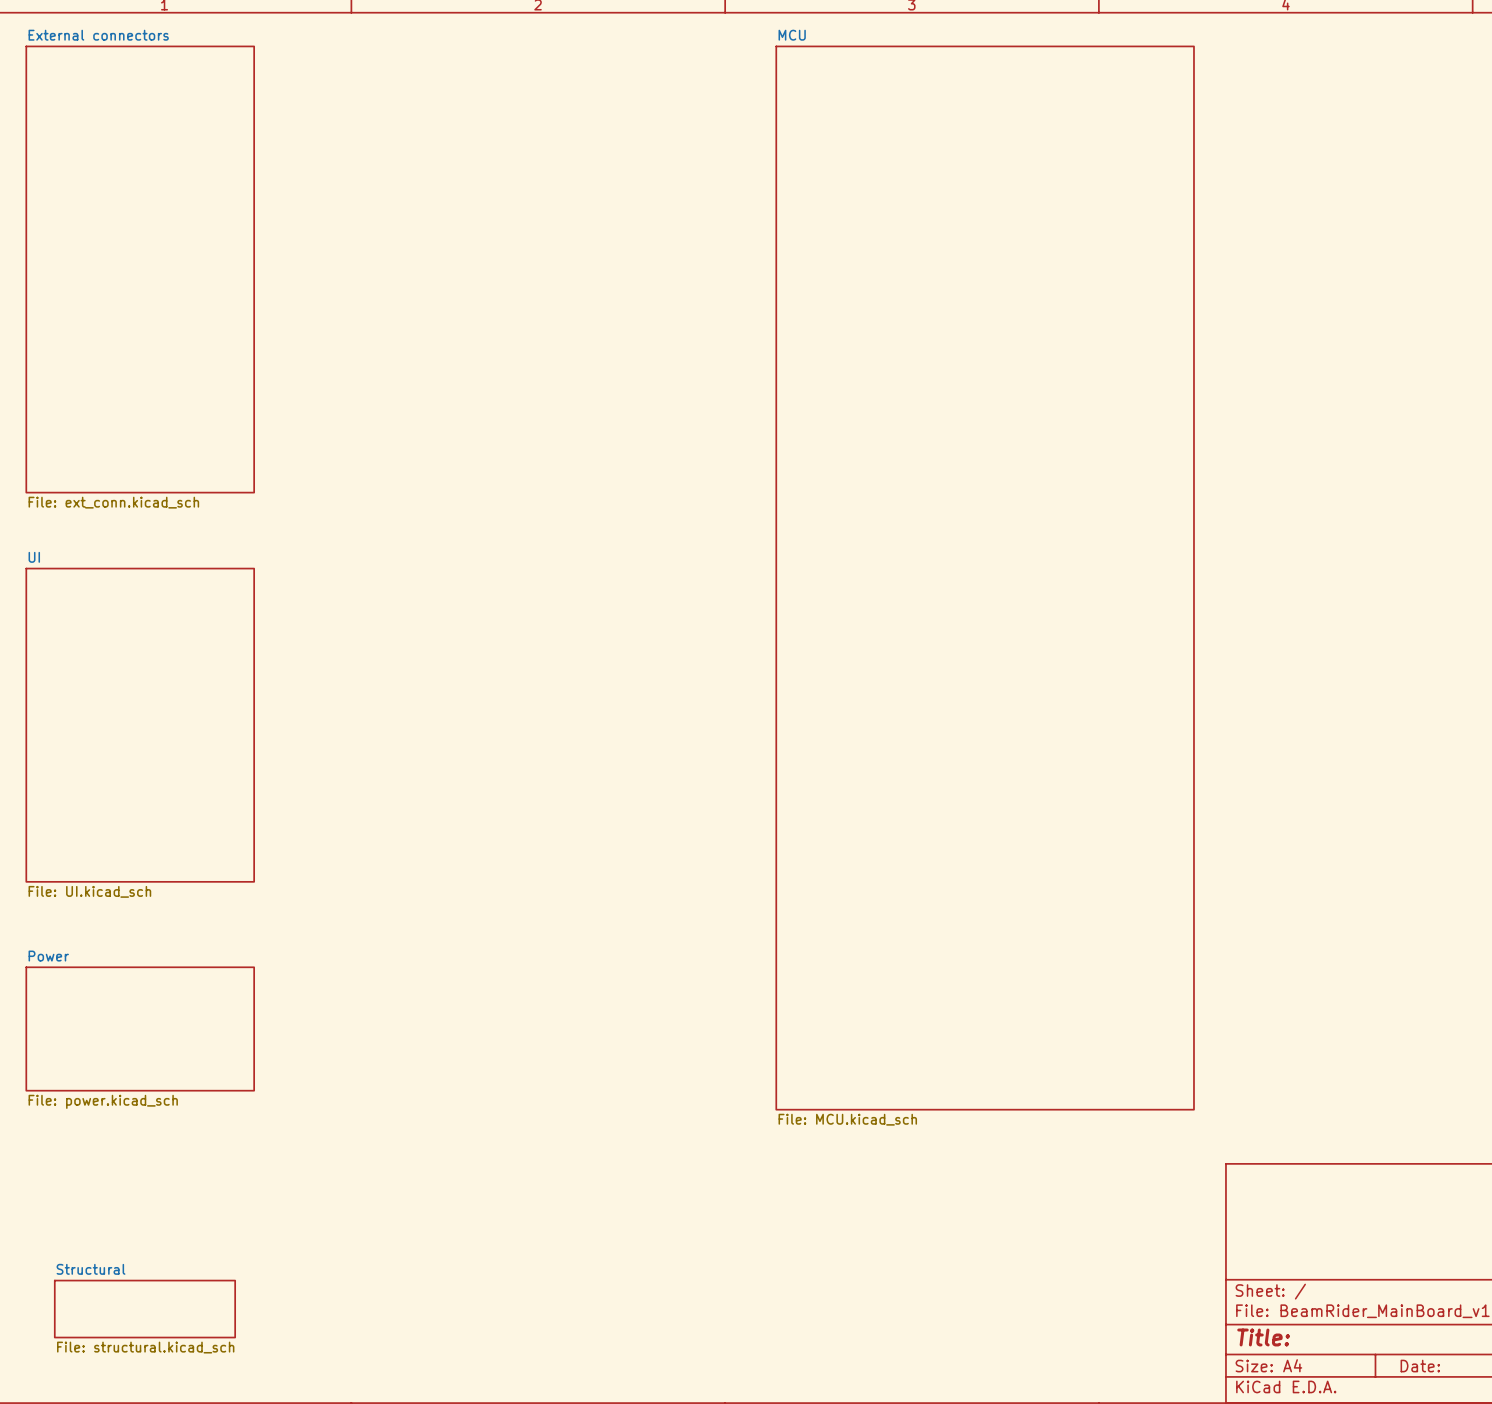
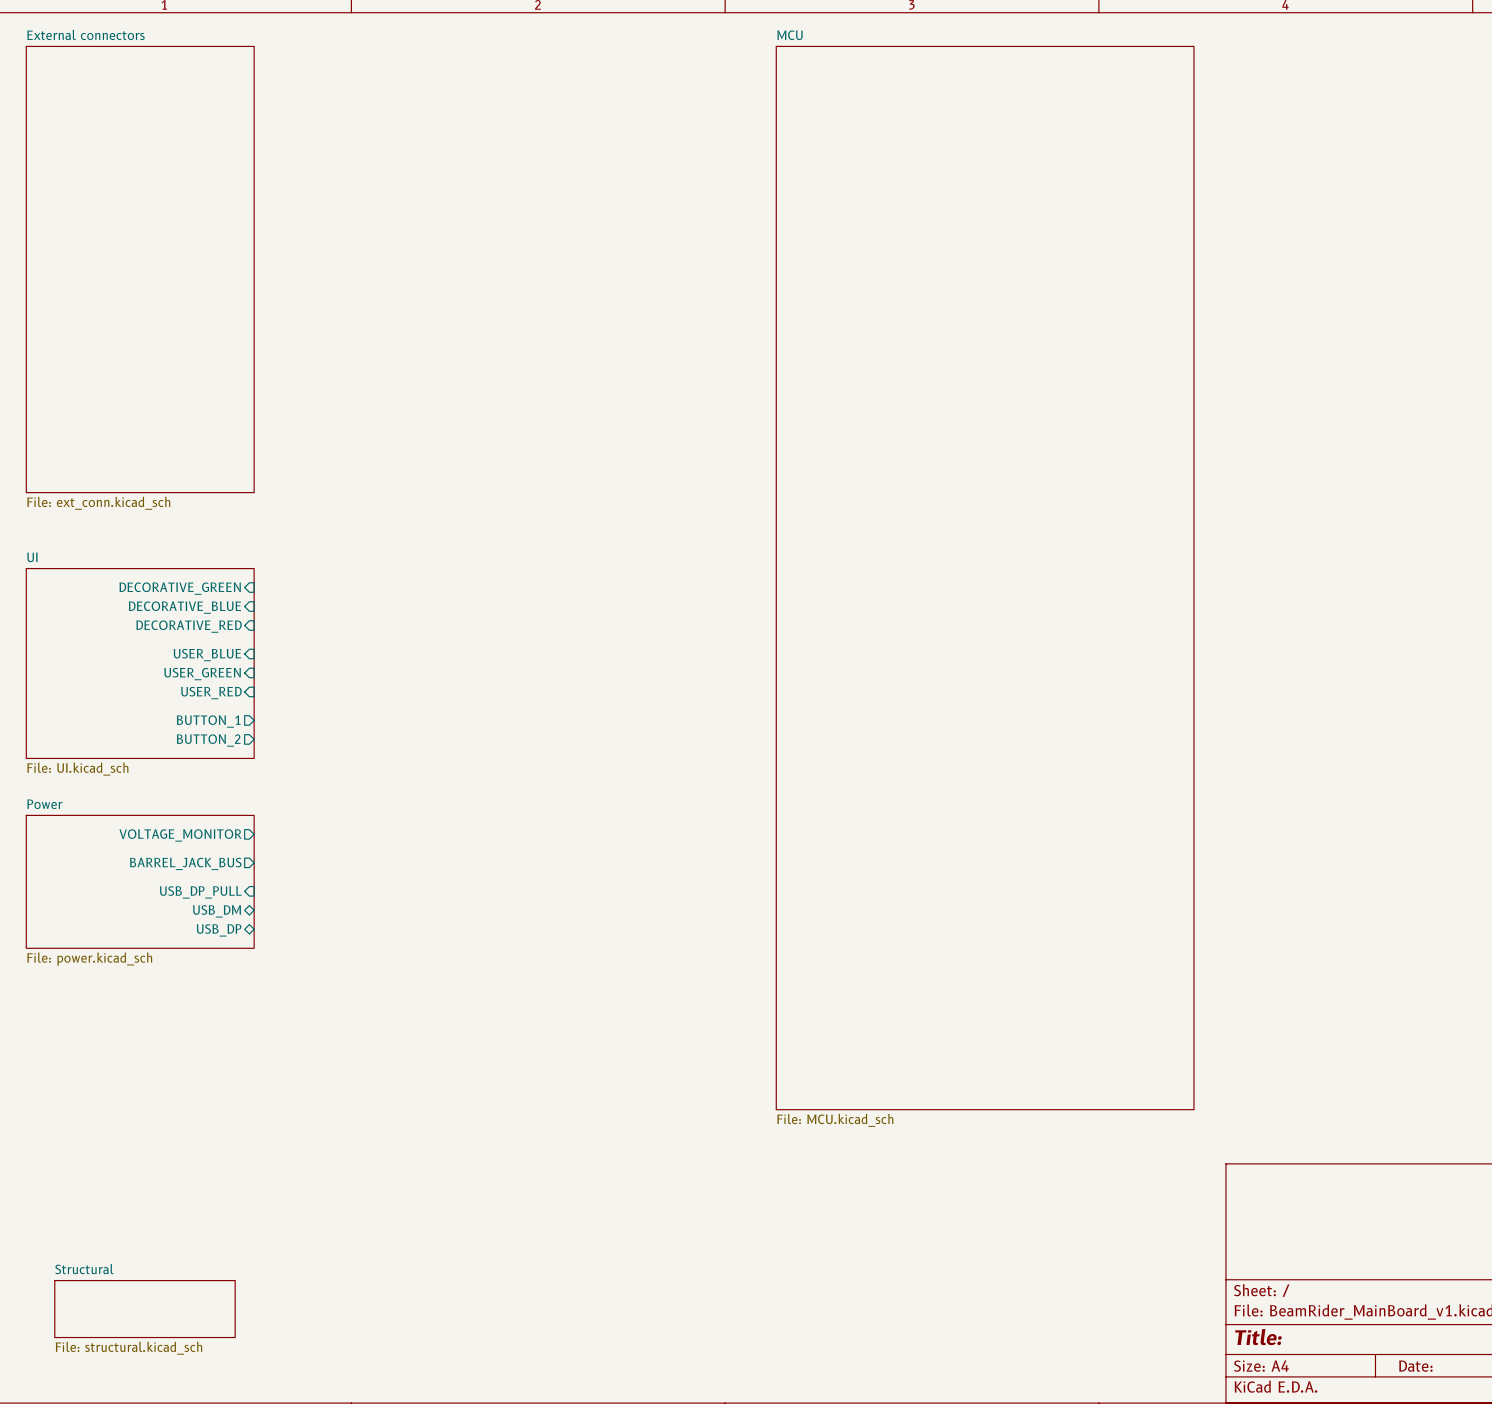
sheet pin: none -> DECORATIVE_GREEN (180, 588)
sheet pin: none -> DECORATIVE_BLUE (184, 607)
sheet pin: none -> DECORATIVE_RED (189, 626)
sheet pin: none -> USER_BLUE (207, 655)
sheet UI: none -> File: UI.kicad_sch (140, 663)
sheet pin: none -> USER_GREEN (202, 674)
sheet pin: none -> USER_RED (211, 693)
sheet pin: none -> BUTTON_1 (208, 721)
sheet UI: File: UI.kicad_sch (140, 725) -> none
sheet pin: none -> BUTTON_2 (208, 740)
sheet pin: none -> VOLTAGE_MONITOR (180, 835)
sheet pin: none -> BARREL_JACK_BUS (185, 863)
sheet Power: none -> File: power.kicad_sch (140, 881)
sheet pin: none -> USB_DP_PULL (200, 892)
sheet pin: none -> USB_DM (216, 911)
sheet pin: none -> USB_DP (219, 930)
sheet Power: File: power.kicad_sch (140, 1028) -> none

